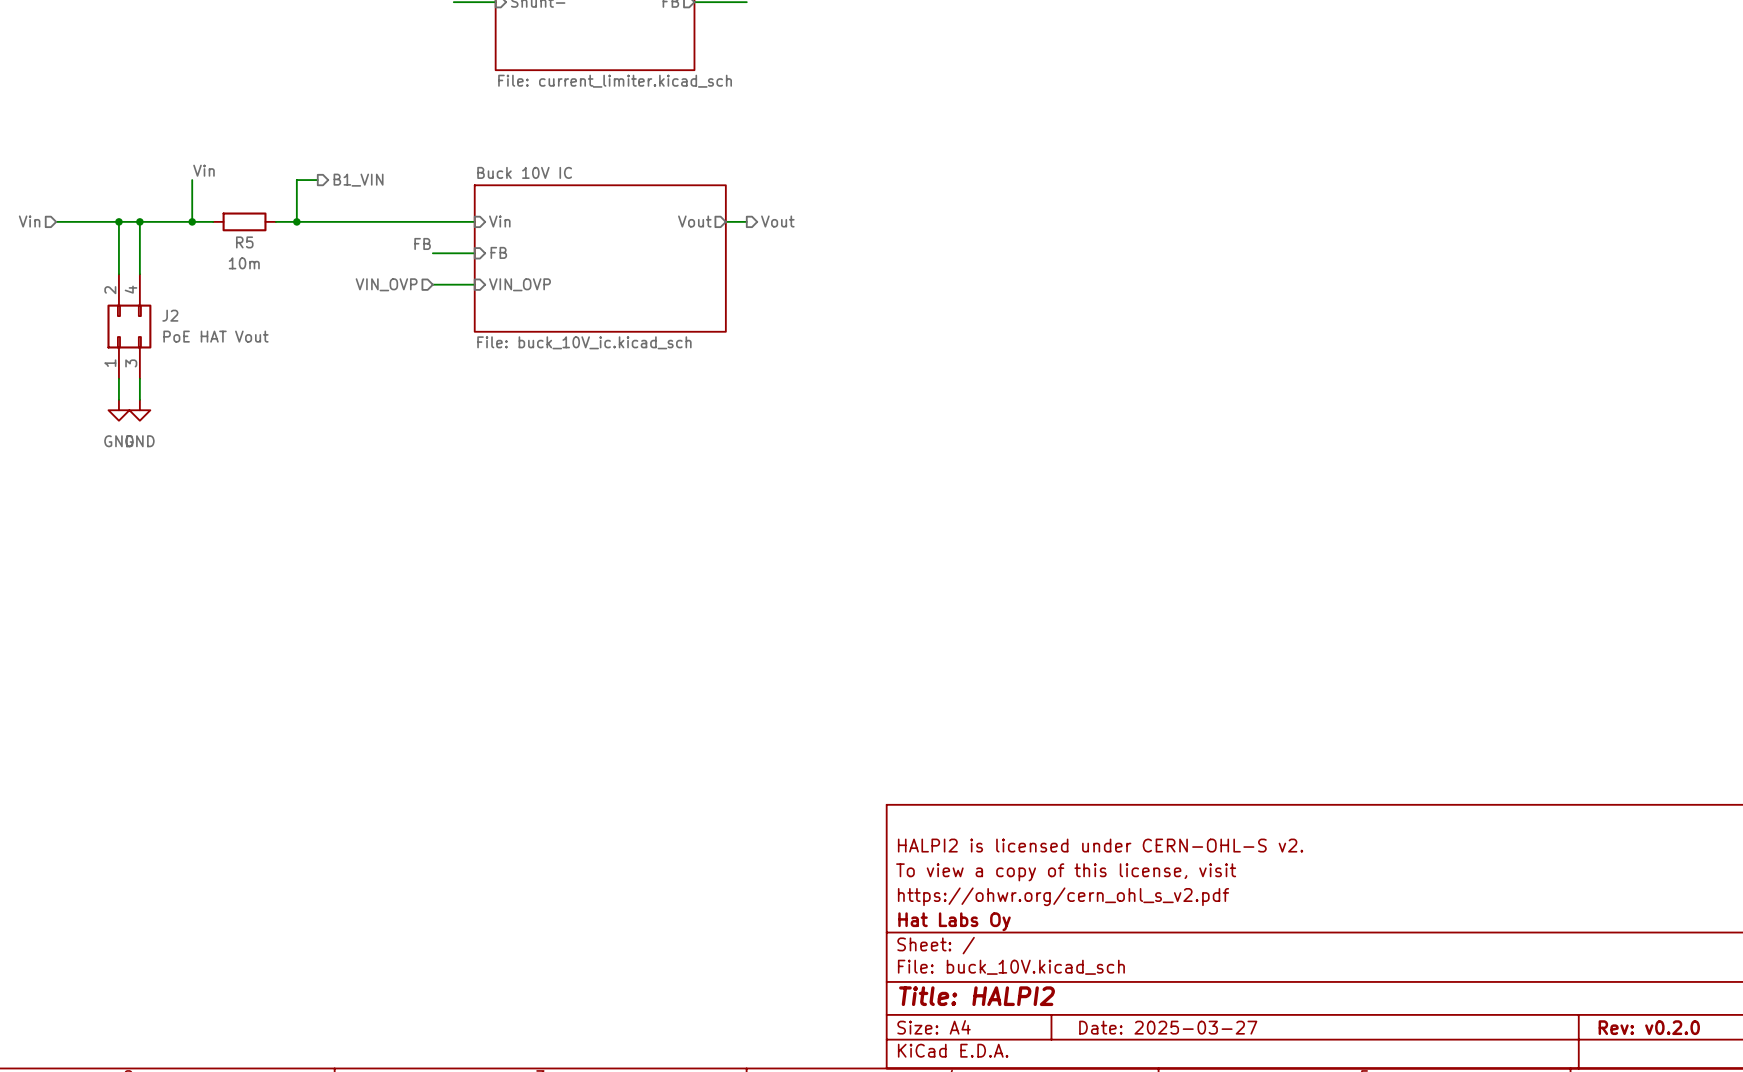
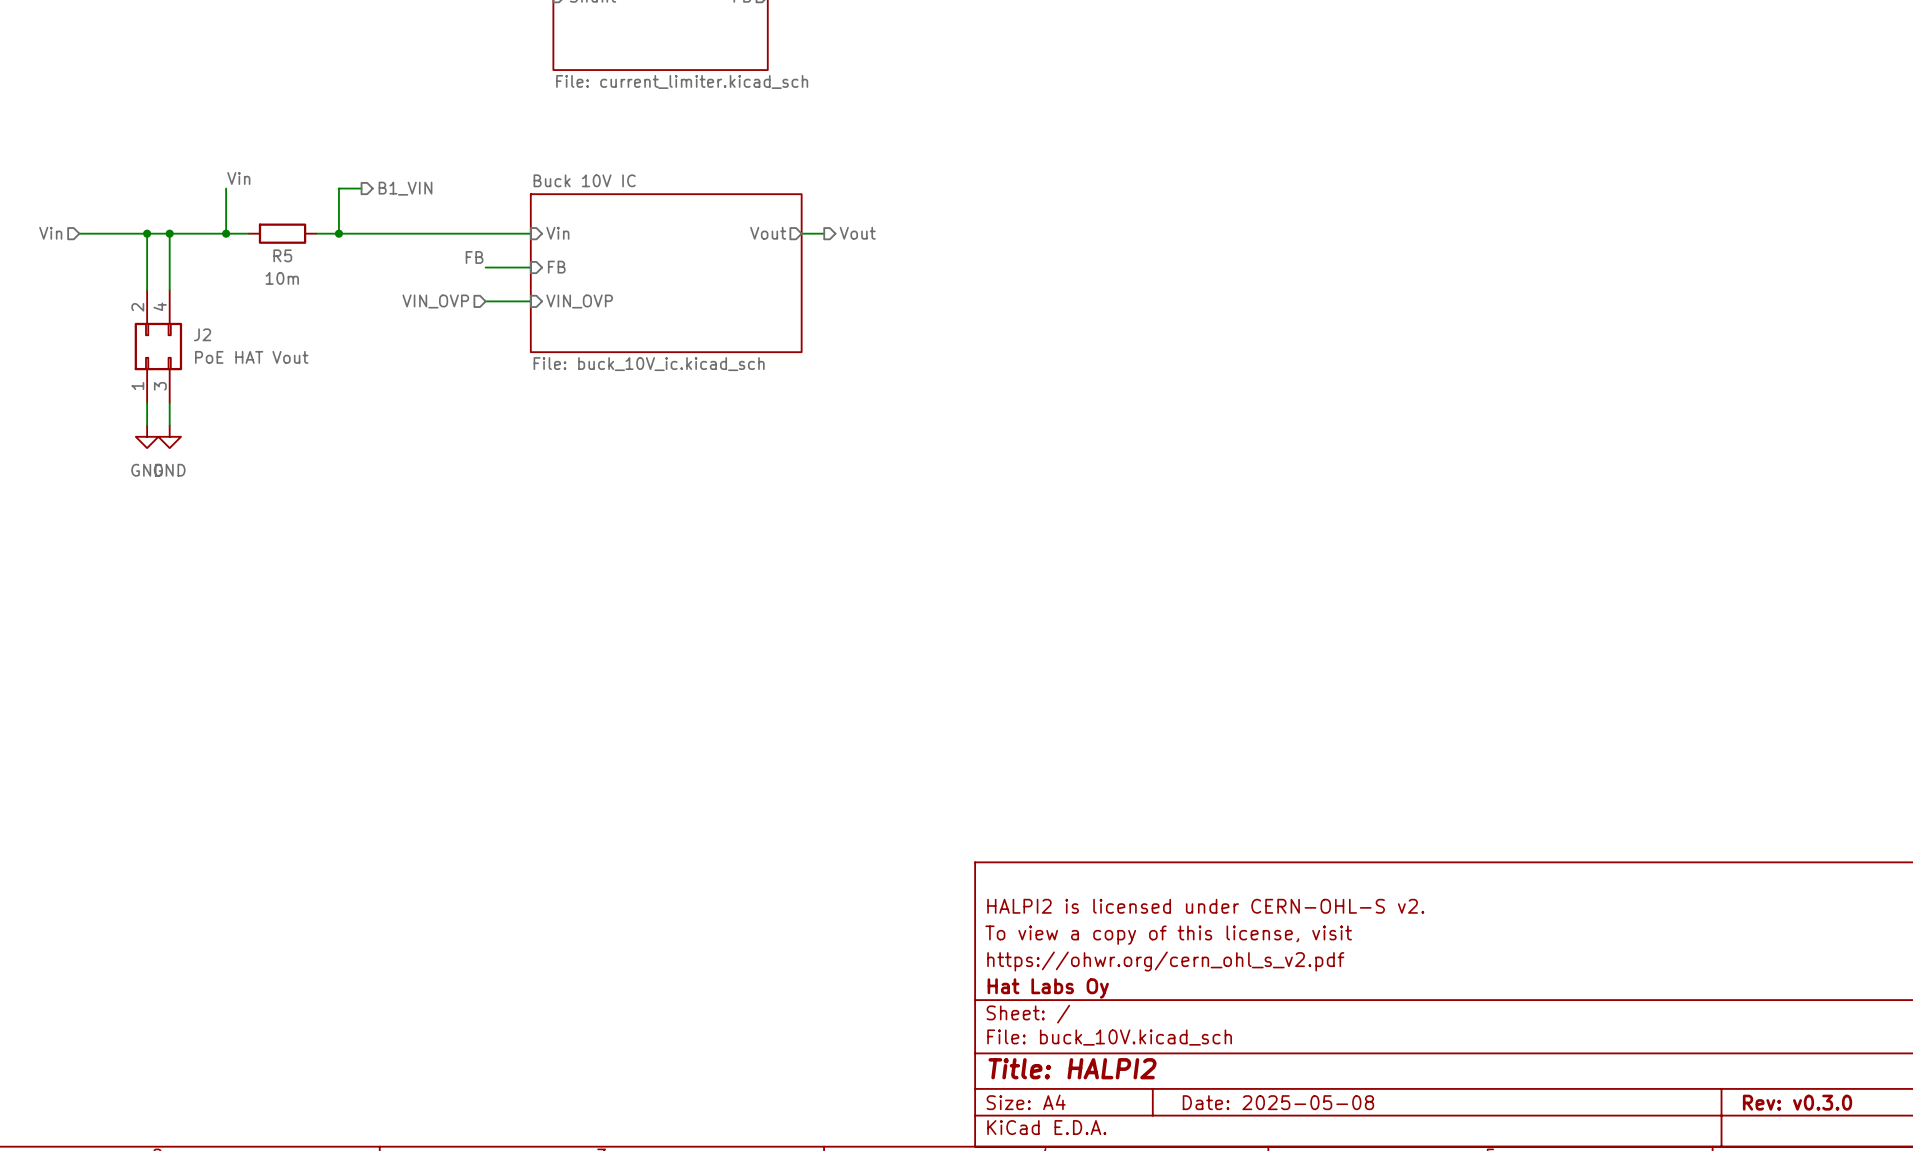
title block: Date: 2025-03-27 (1168, 1027) -> Date: 2025-05-08 (1278, 1102)
title block: Rev: v0.2.0 (1649, 1027) -> Rev: v0.3.0 (1797, 1102)

